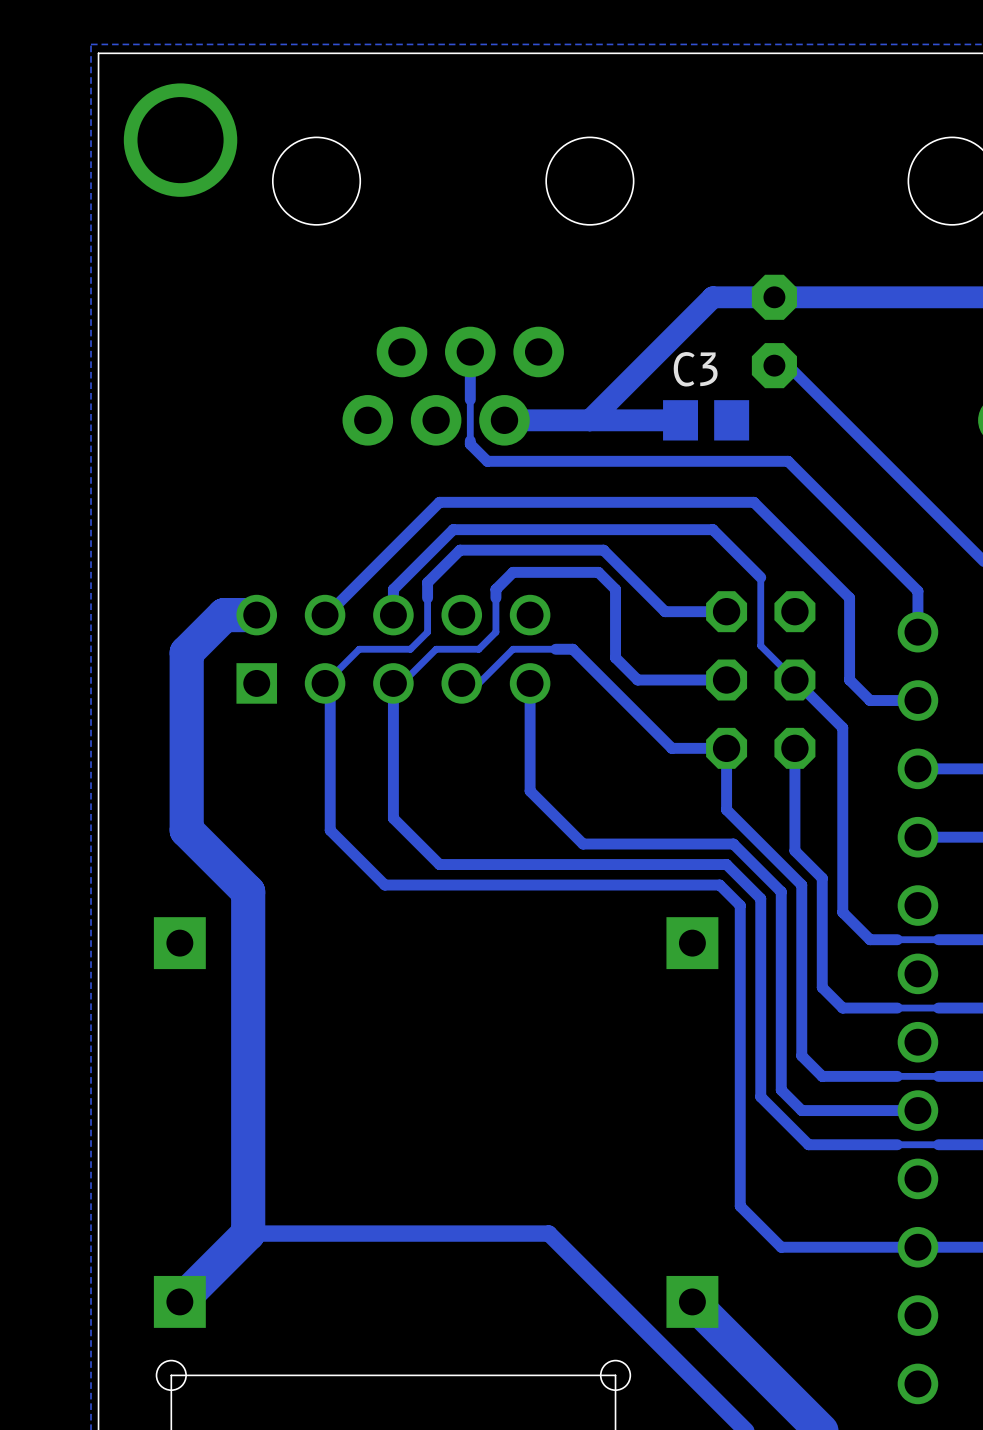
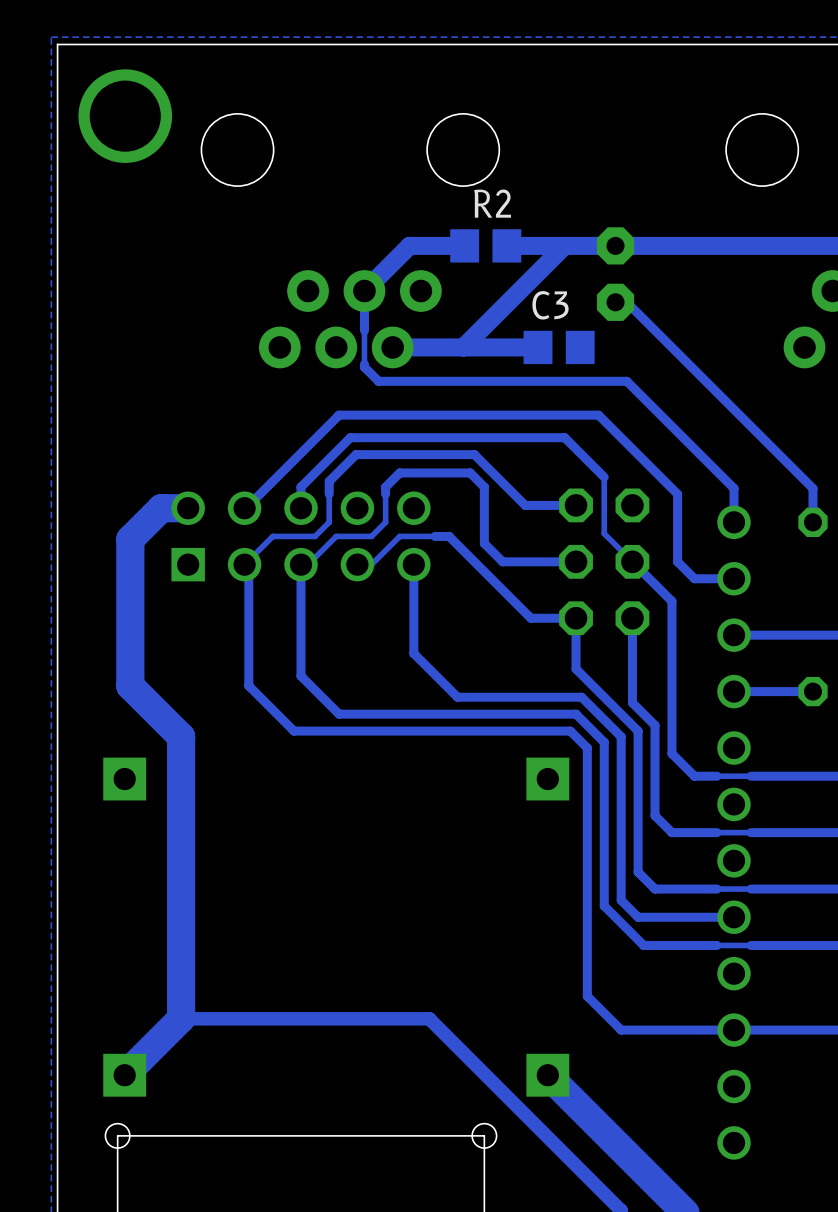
track: none -> (464, 245) (409, 245) (364, 291)
R2: none -> (485, 245)
track: none -> (564, 245) (506, 245)

